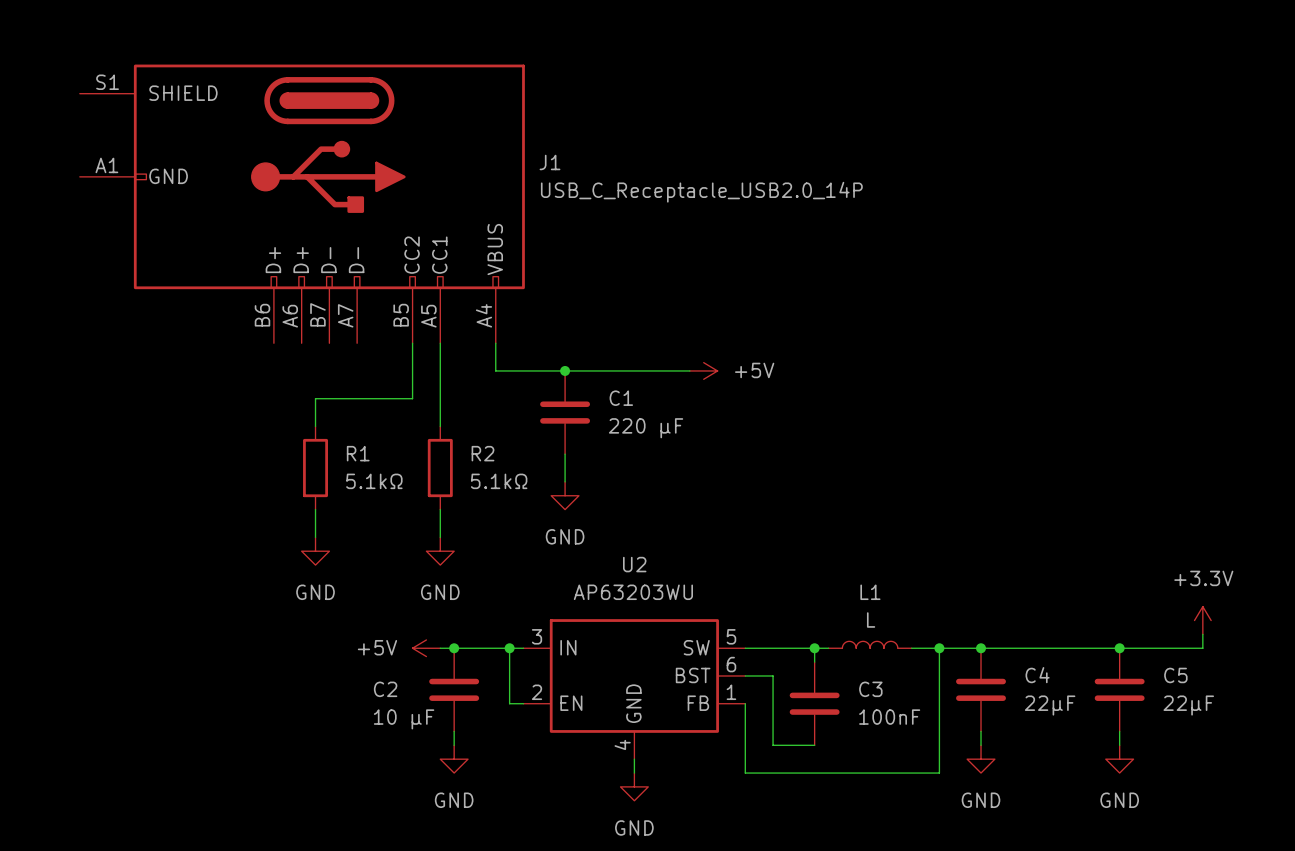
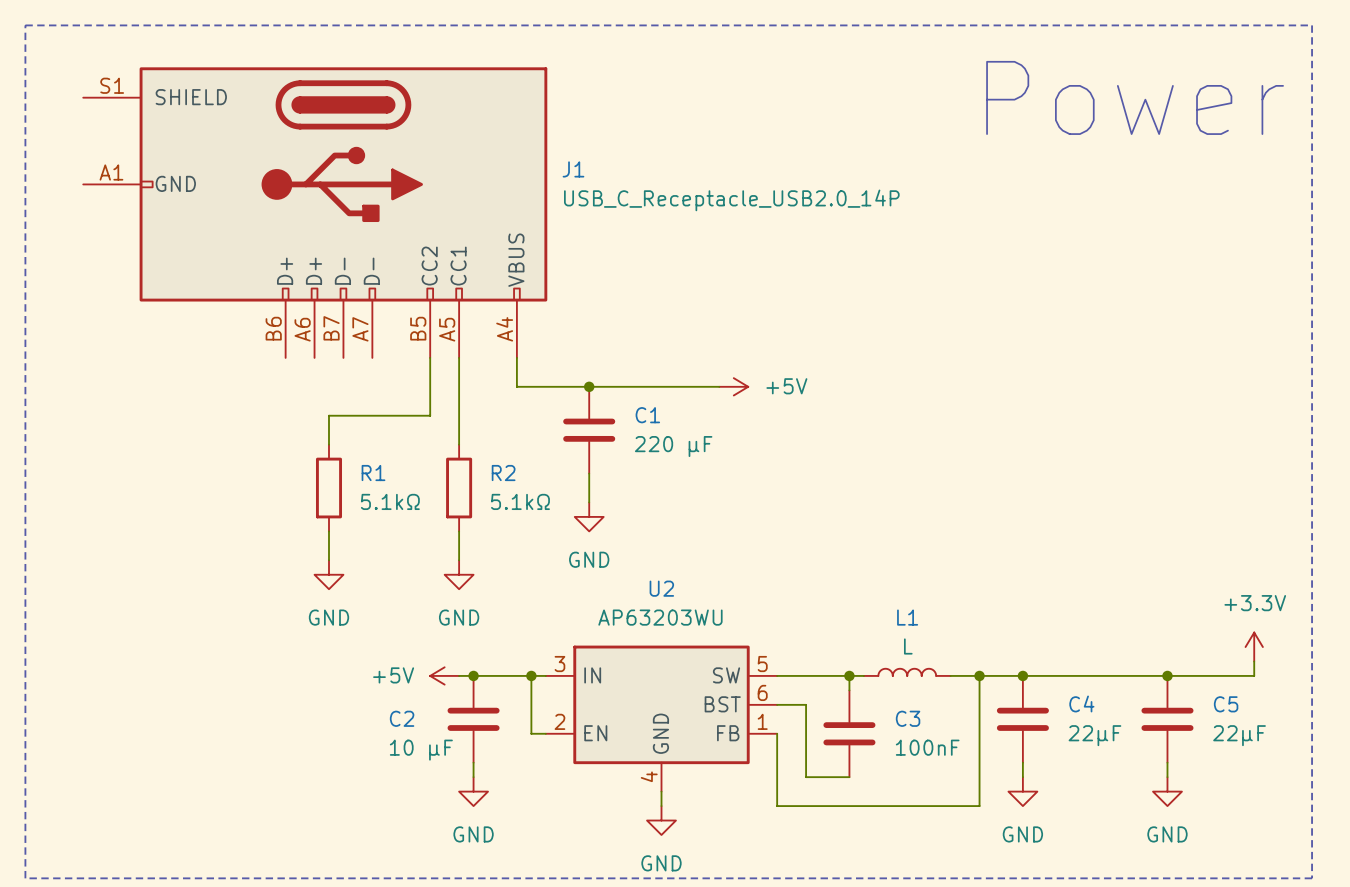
line: none -> (25, 25) (1312, 25) (1312, 878) (25, 878) (25, 25)
text: none -> Power (1135, 97)

